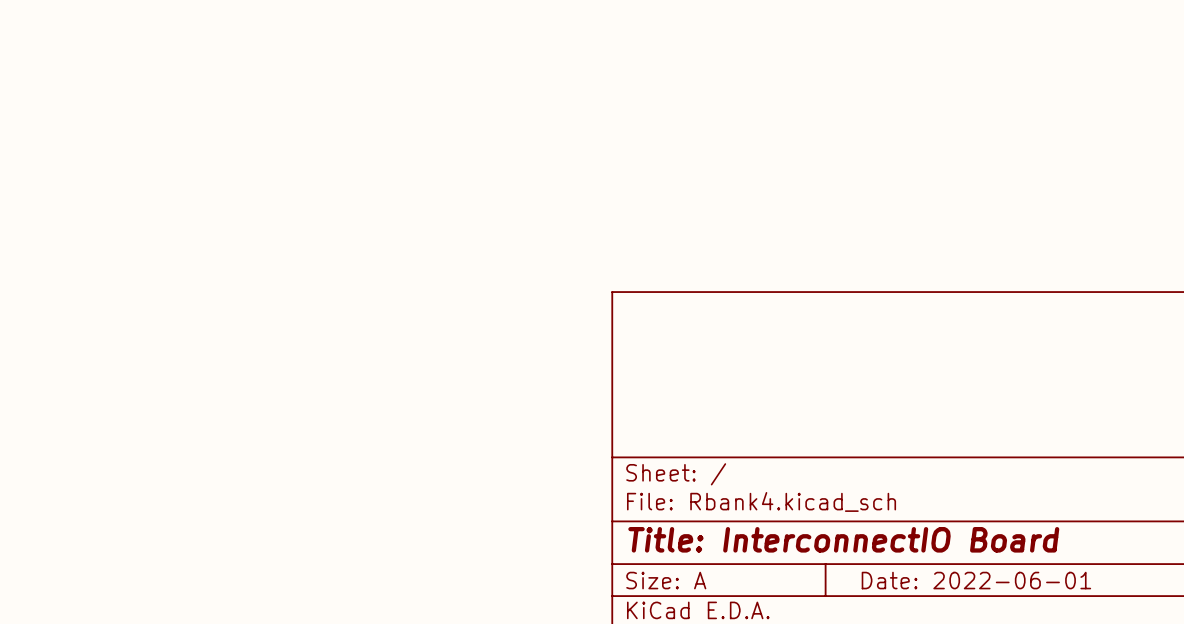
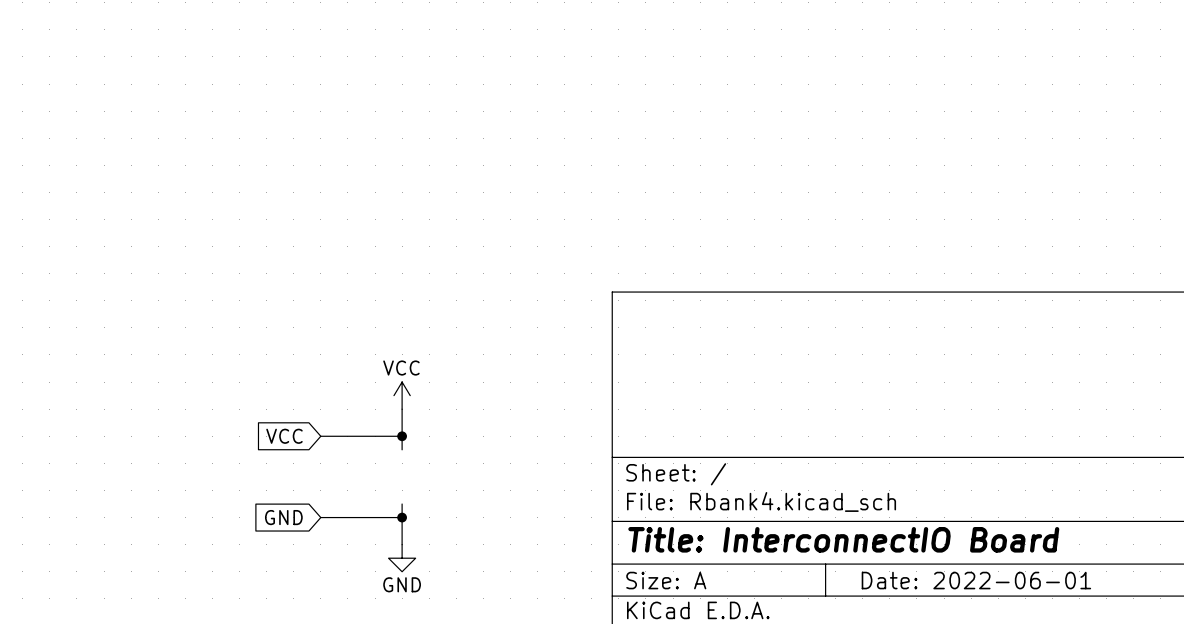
power symbol: none -> VCC (402, 395)
wire: none -> (402, 409) (402, 449)
global label: none -> VCC (284, 436)
wire: none -> (320, 436) (402, 436)
junction: none -> (402, 436)
wire: none -> (402, 504) (402, 544)
global label: none -> GND (283, 517)
wire: none -> (320, 517) (402, 517)
junction: none -> (402, 517)
power symbol: none -> GND (402, 558)

